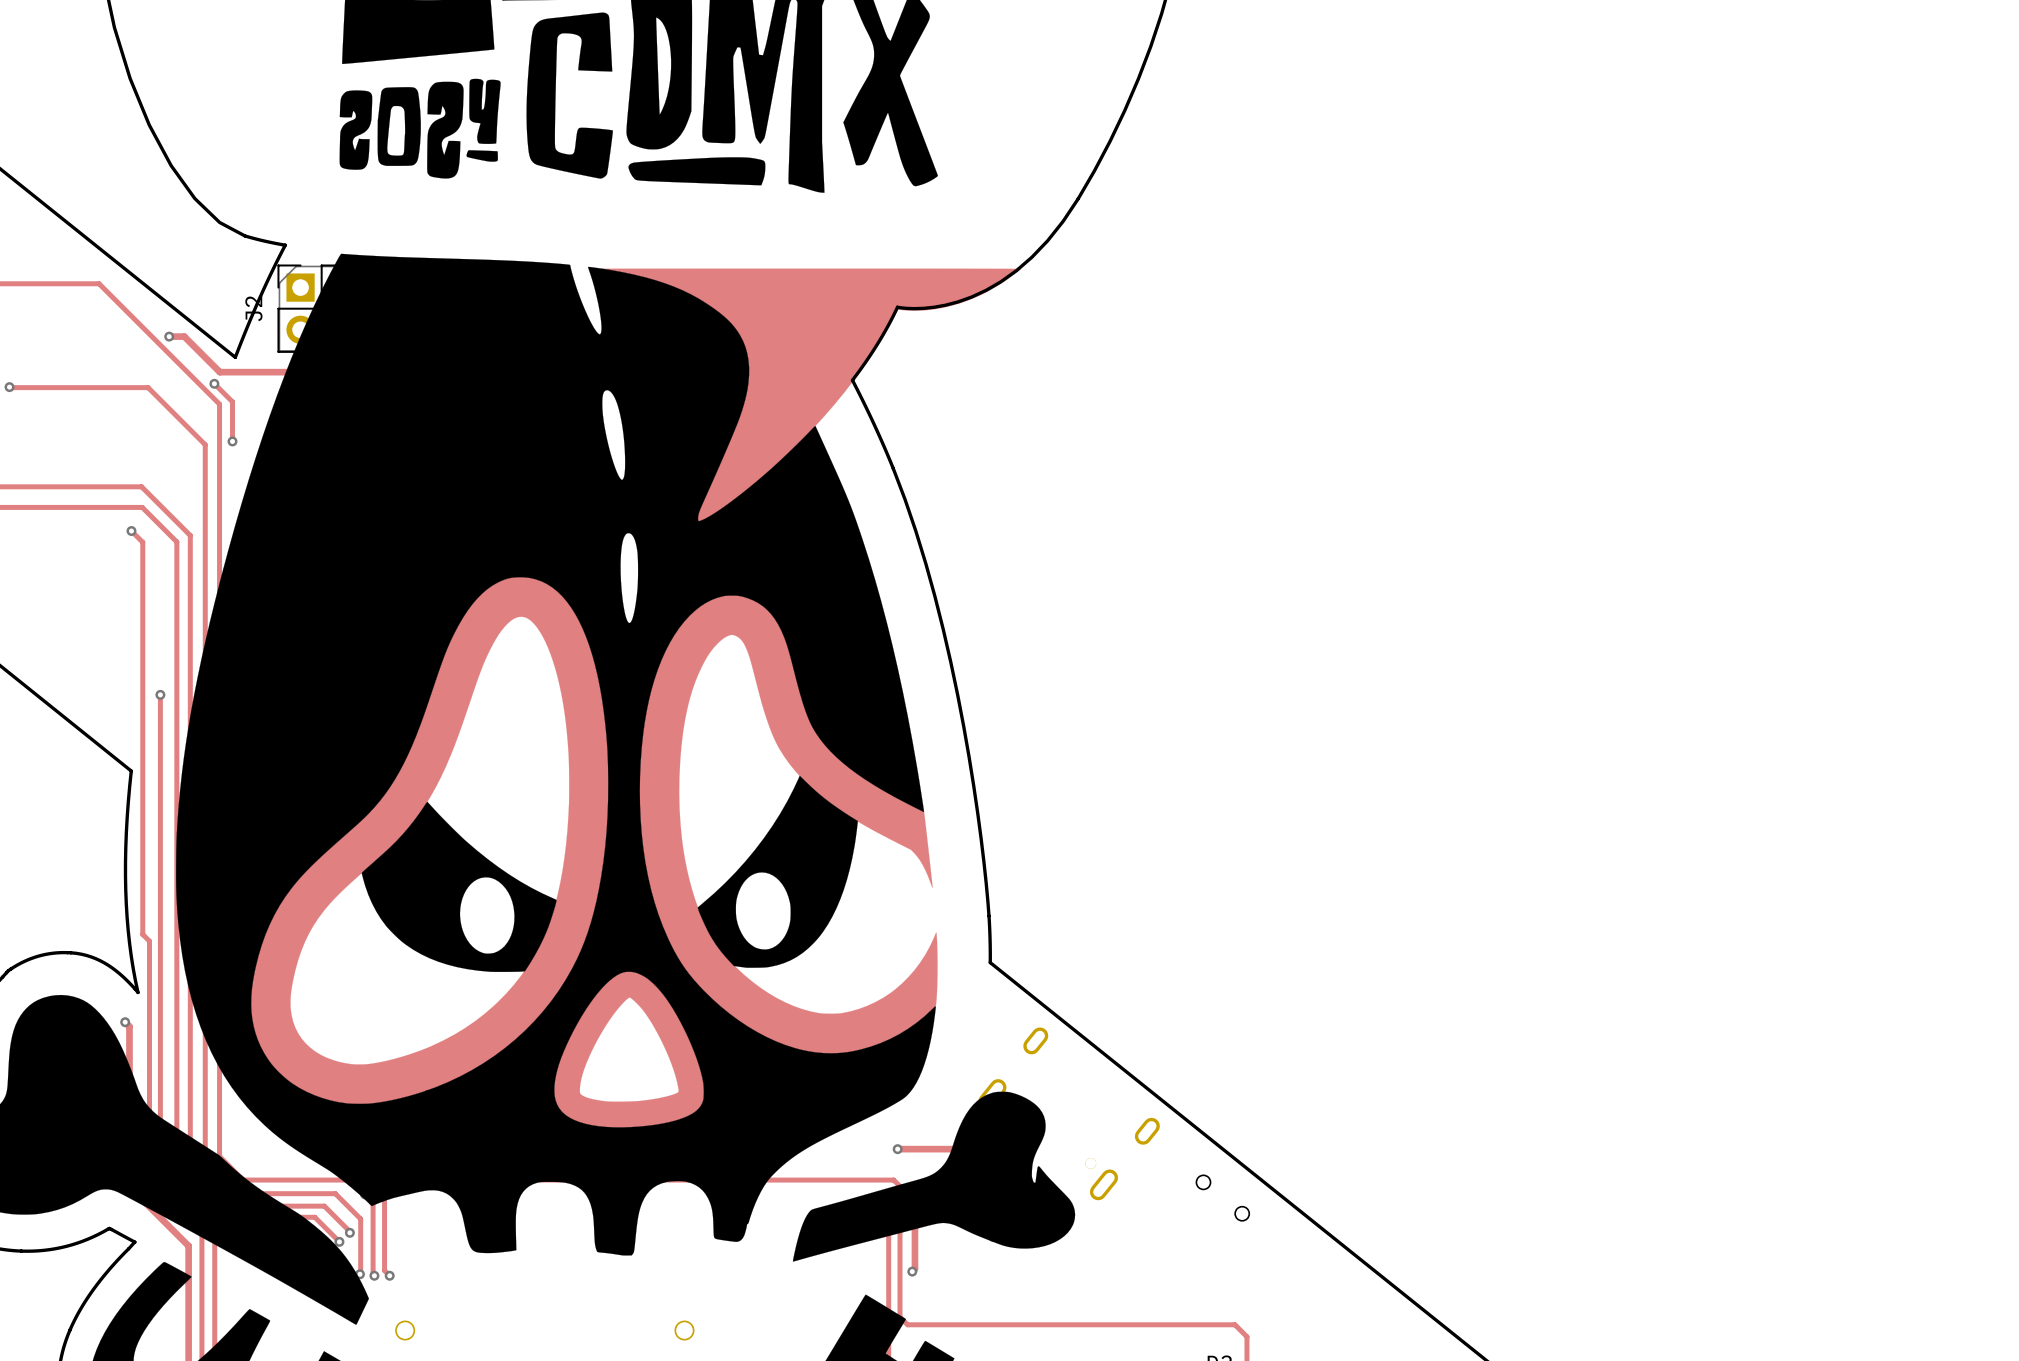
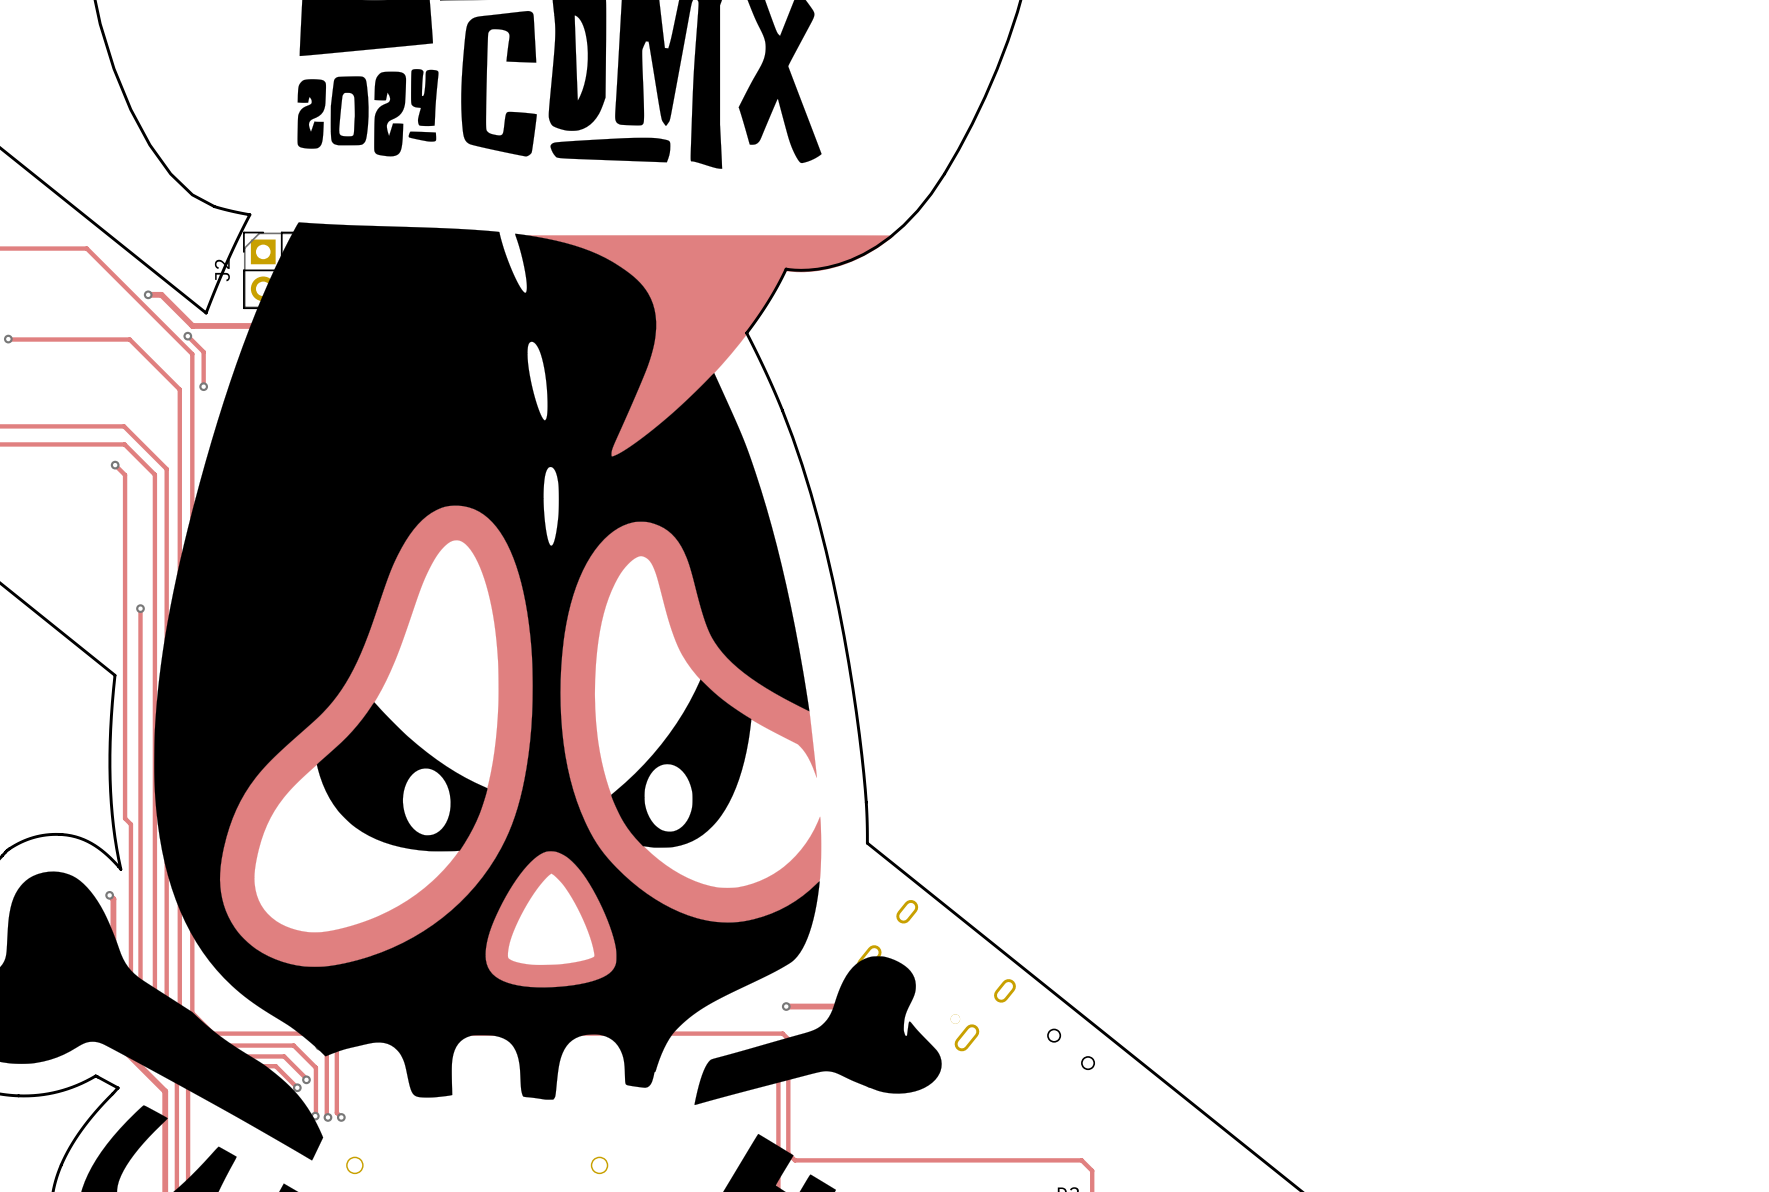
track: (914, 1195) (914, 1268) (912, 1271) -> none
via: (912, 1271) -> none

